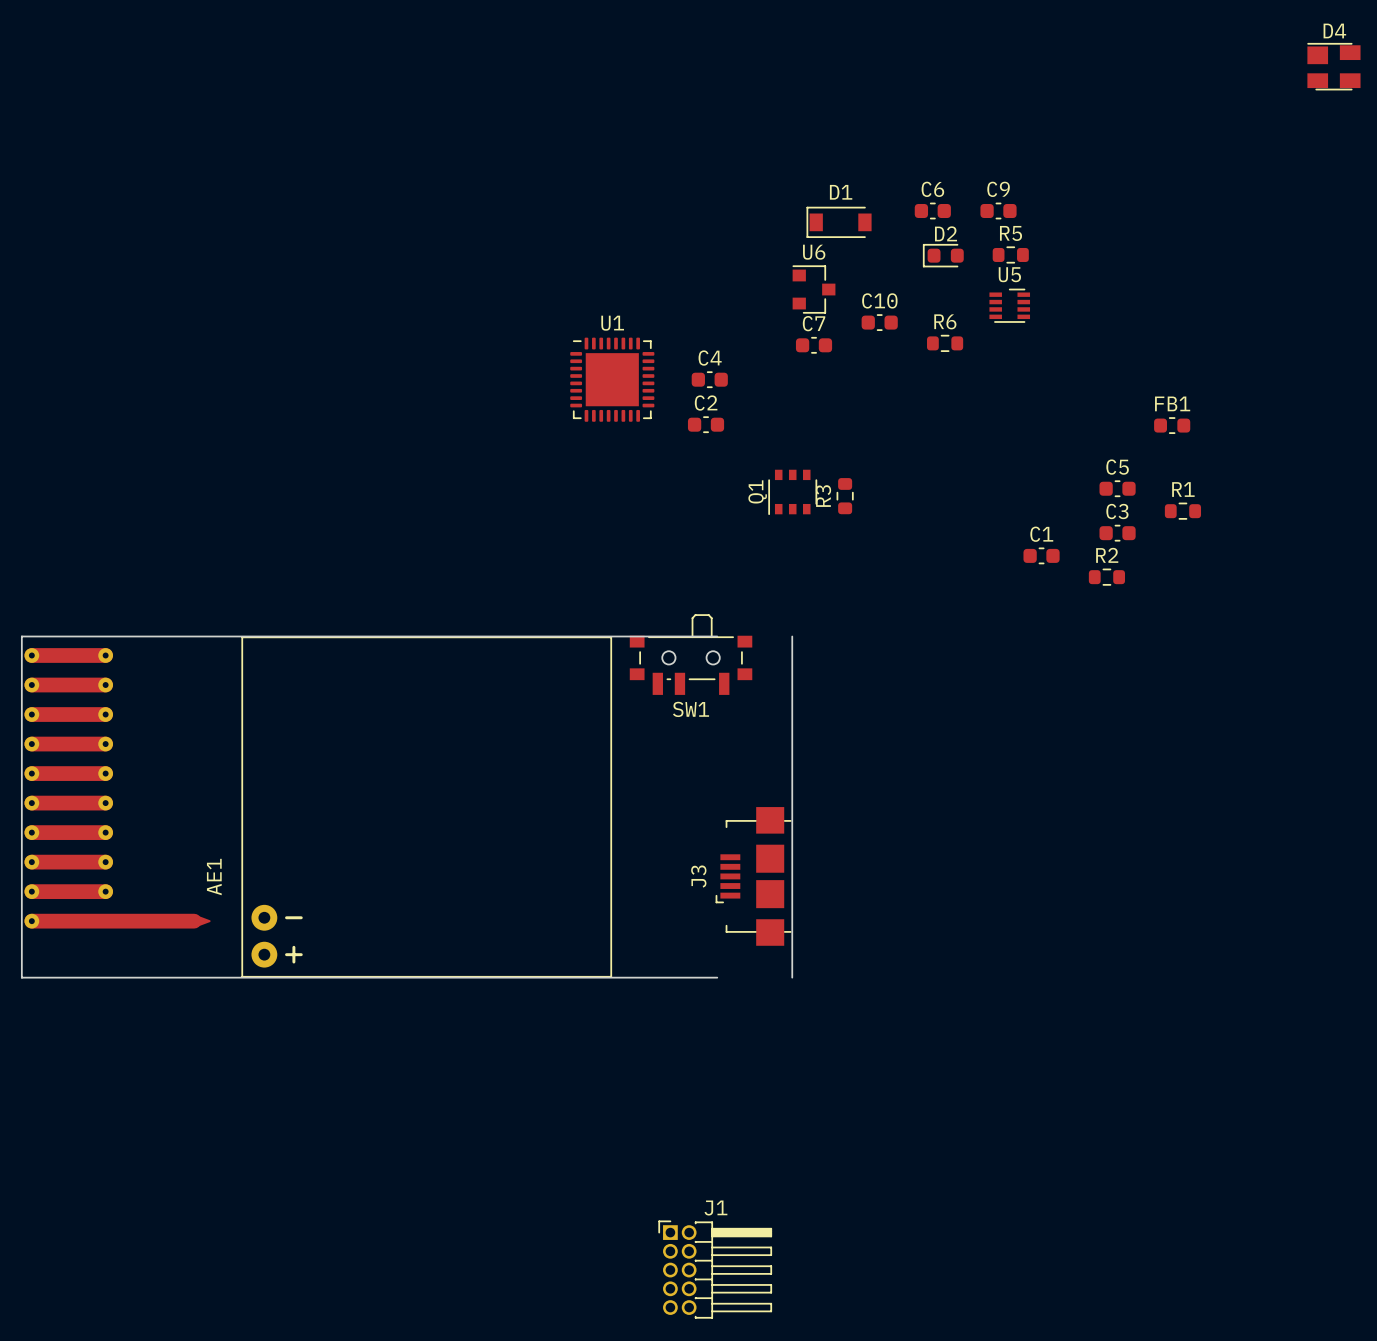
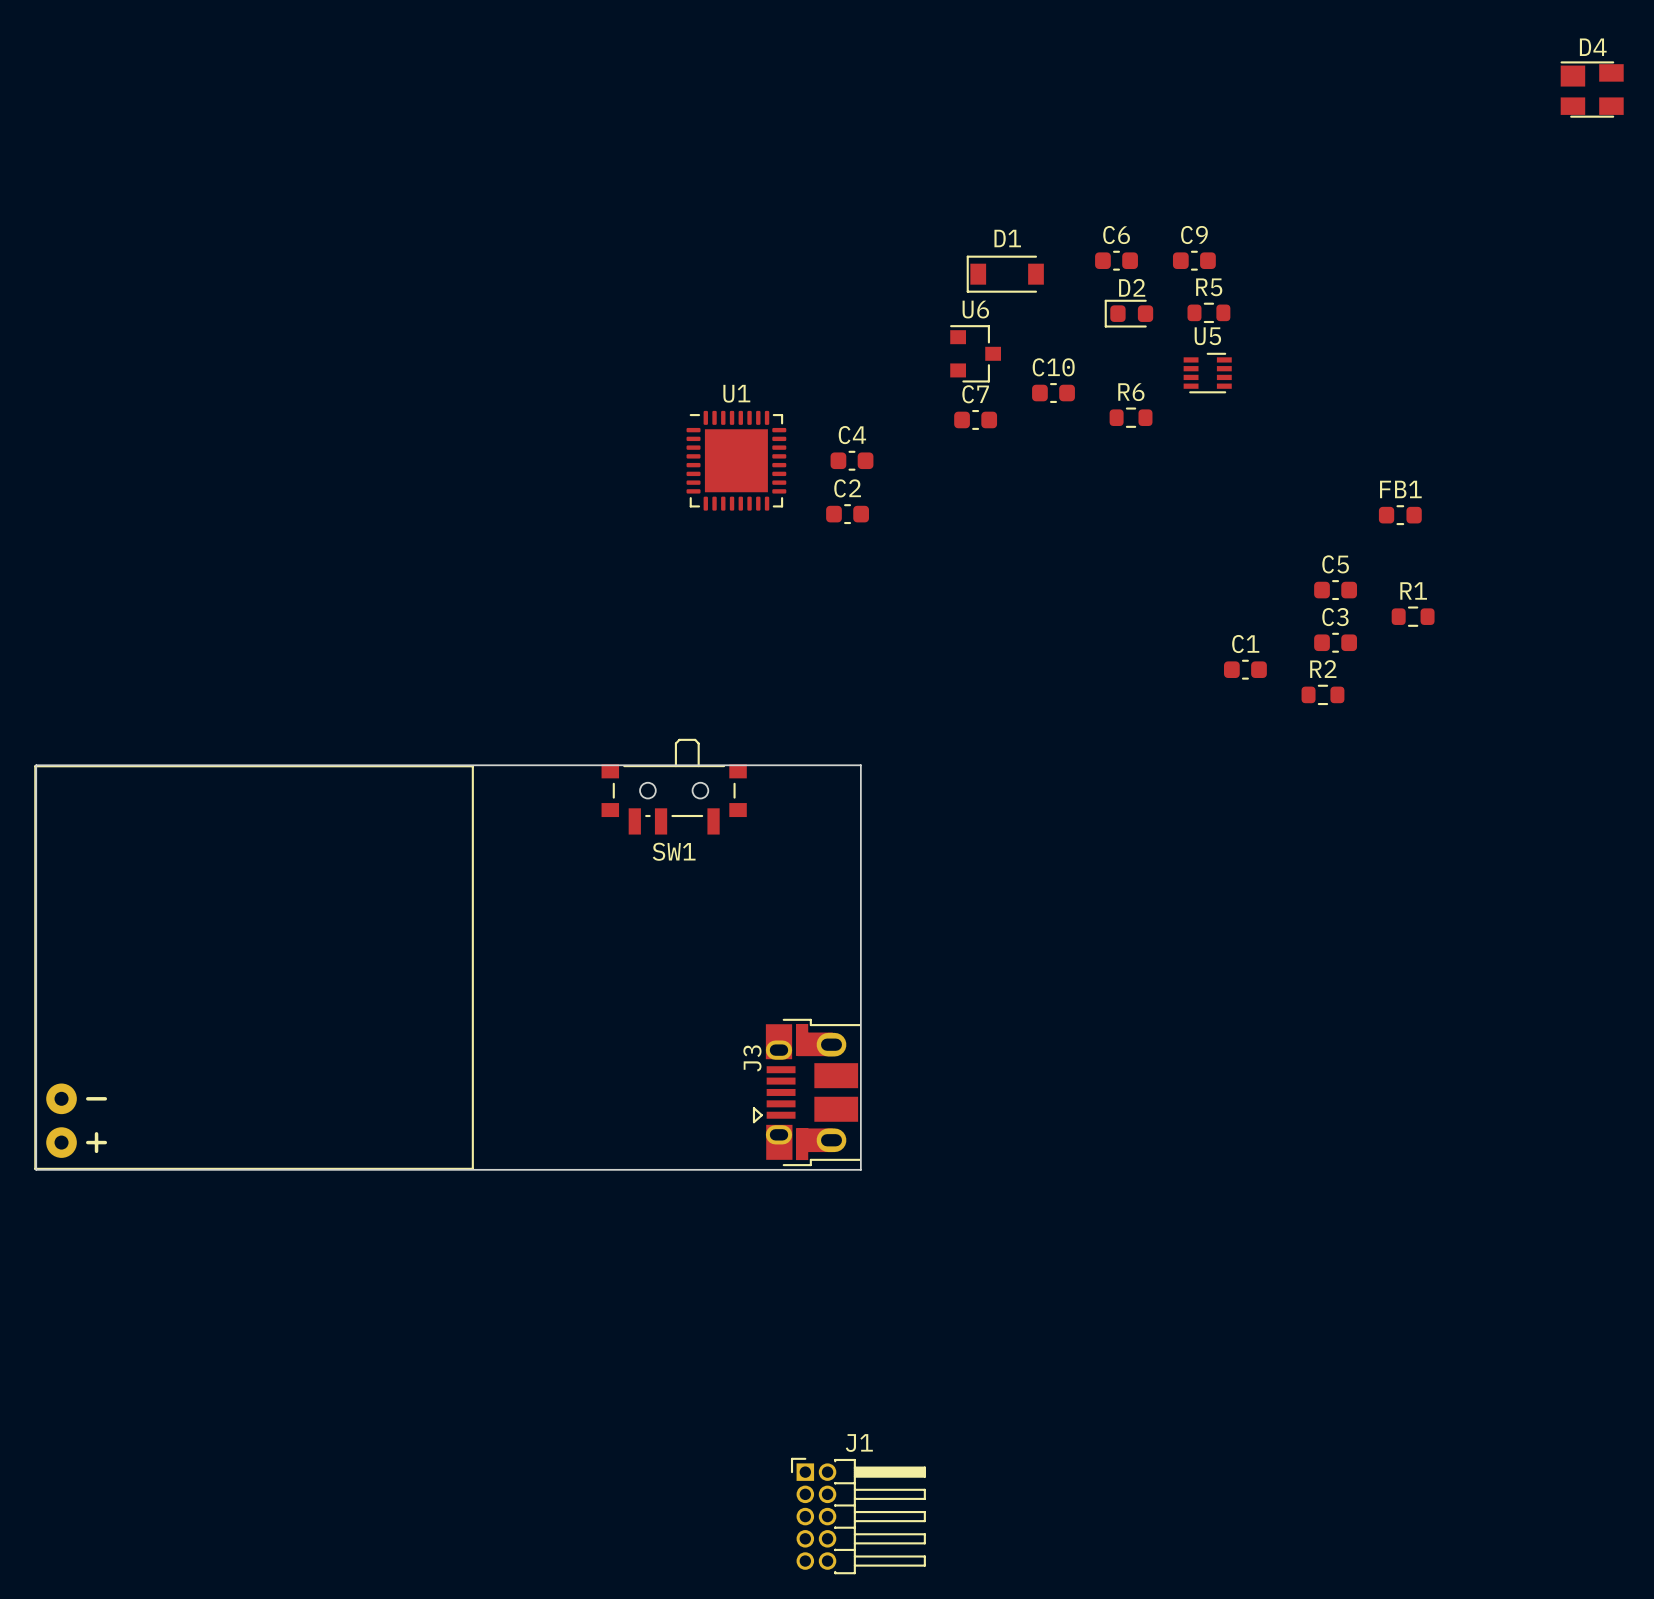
Q1: (792, 492) -> none
R3: (845, 496) -> none
board edge: (792, 636) (792, 977) -> (860, 765) (860, 1169)
SW1 position: (691, 654) -> (674, 786)
AE1: (117, 788) -> none
part position: (426, 807) -> (254, 967)
J3 footprint: [715, 807, 792, 946] -> [752, 1018, 861, 1167]
J3 name position: J3 (698, 876) -> J3 (752, 1058)

